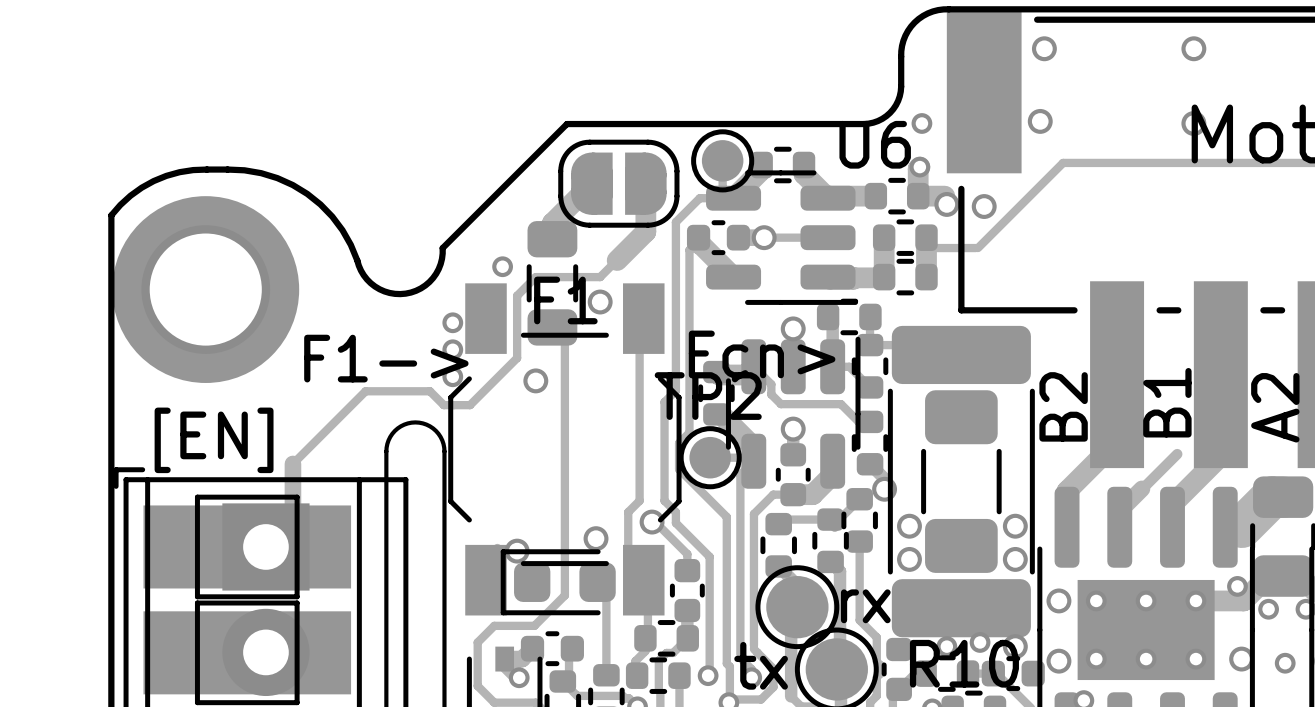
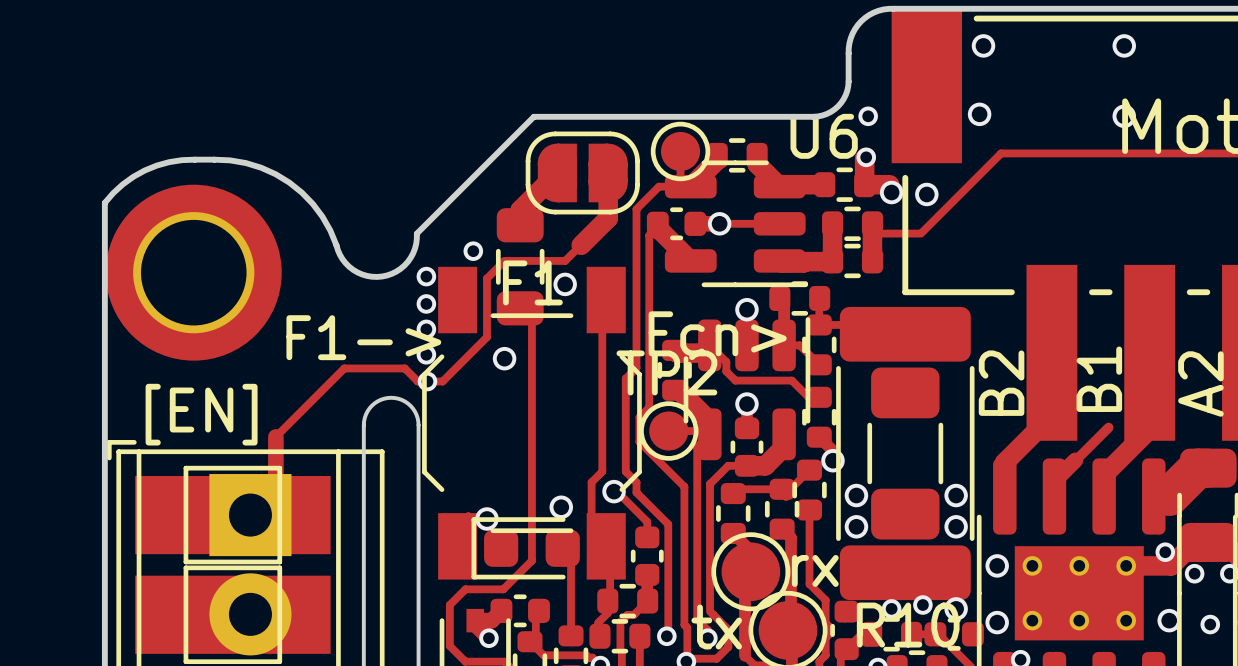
via: none -> (426, 276)
via: none -> (427, 381)

